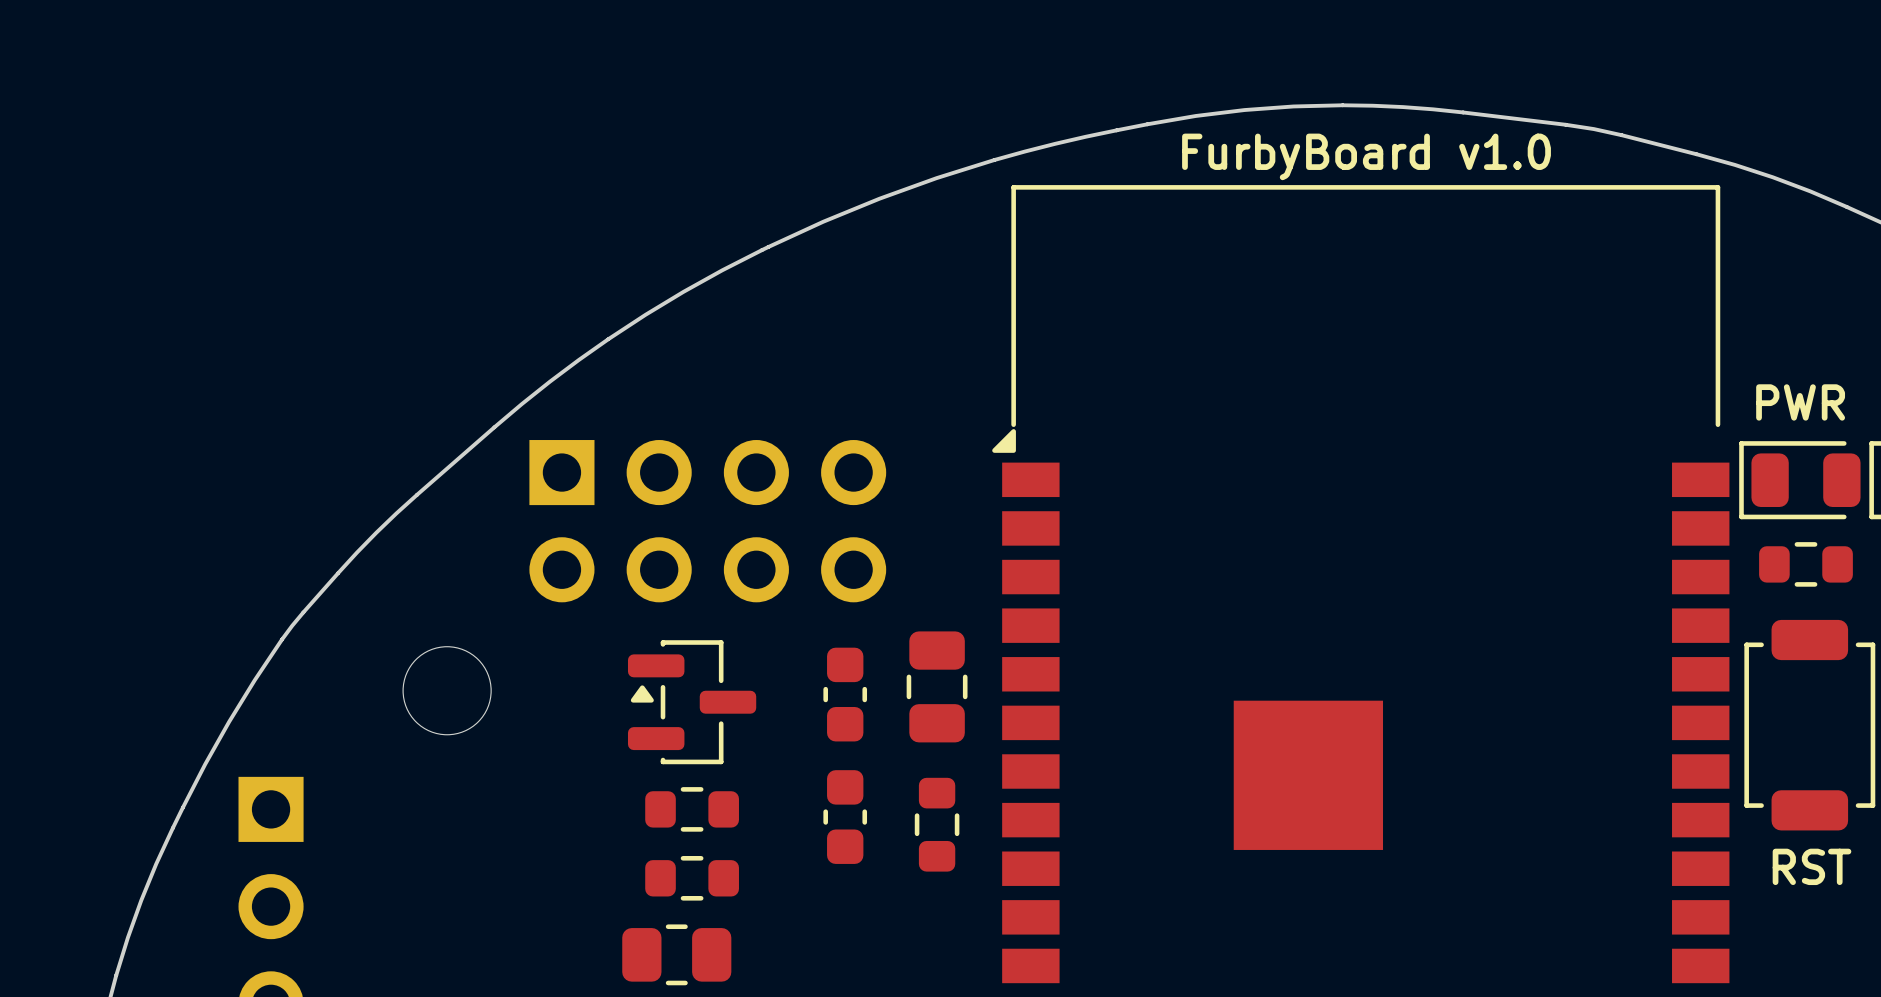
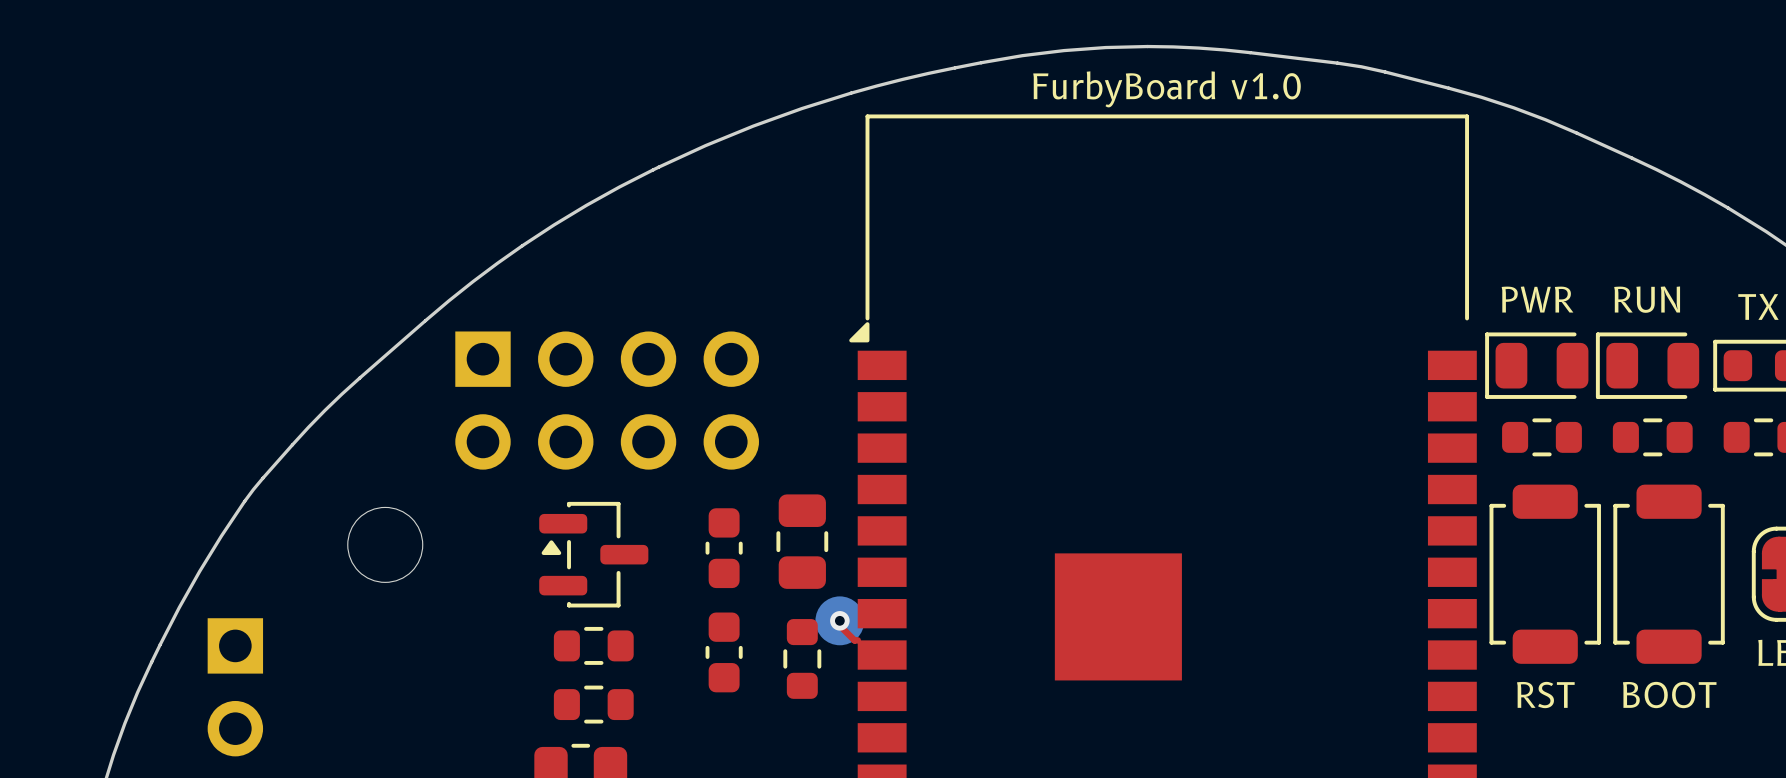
top track: none -> (839, 620) (839, 625) (854, 640) (857, 640)
part: none -> (839, 620)
via: none -> (839, 620)

